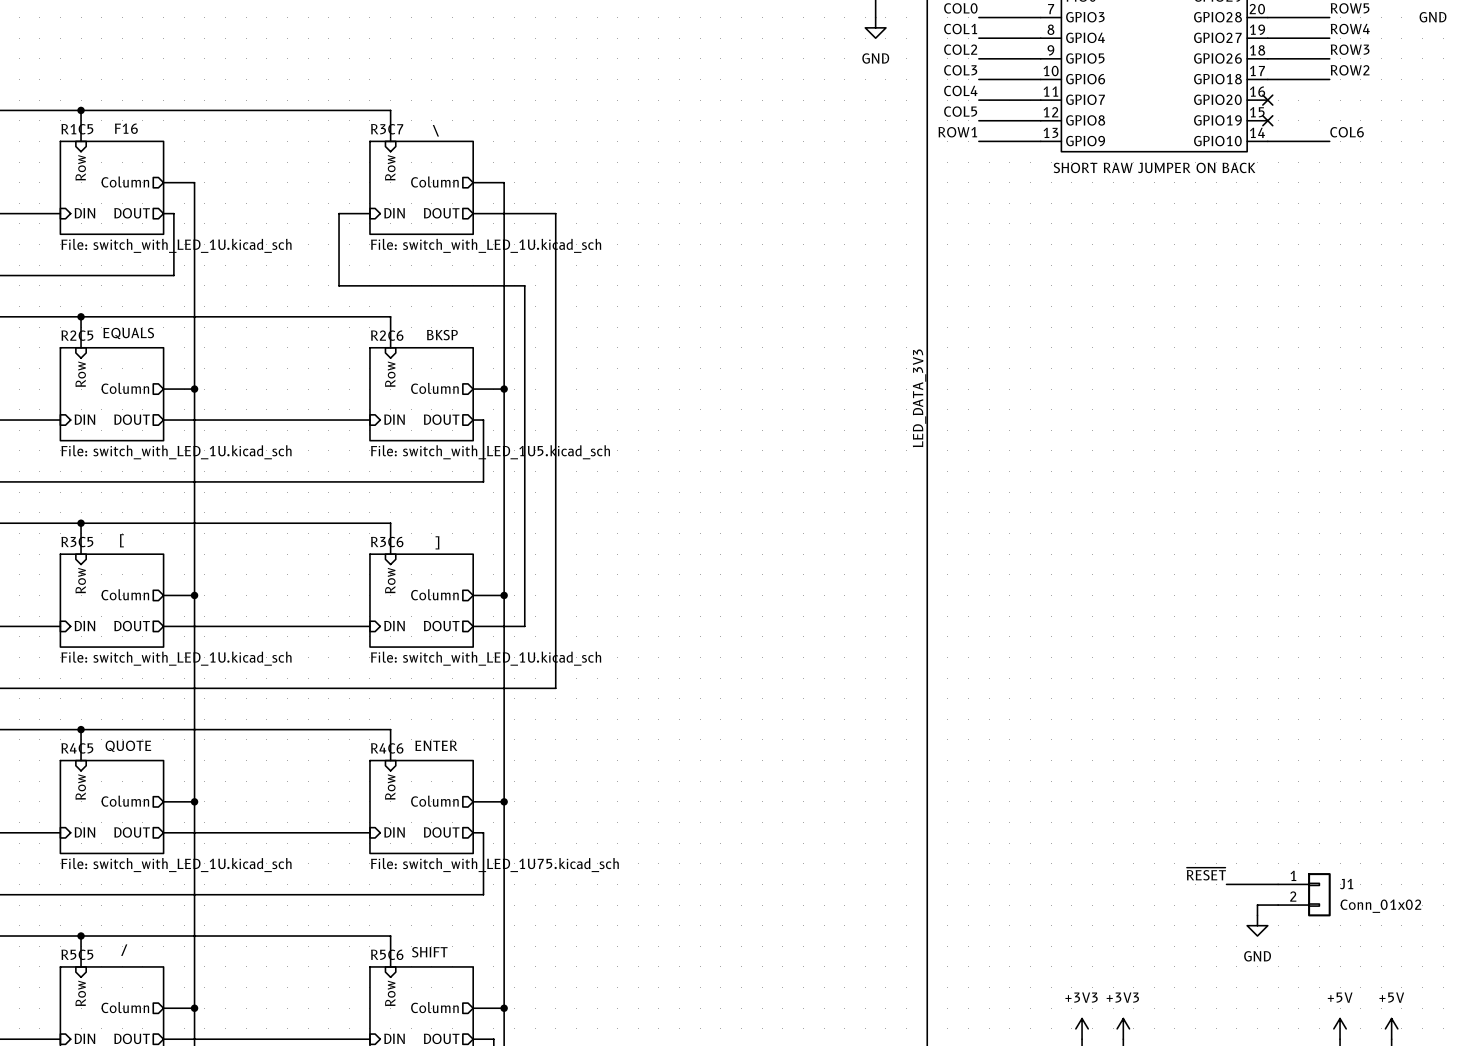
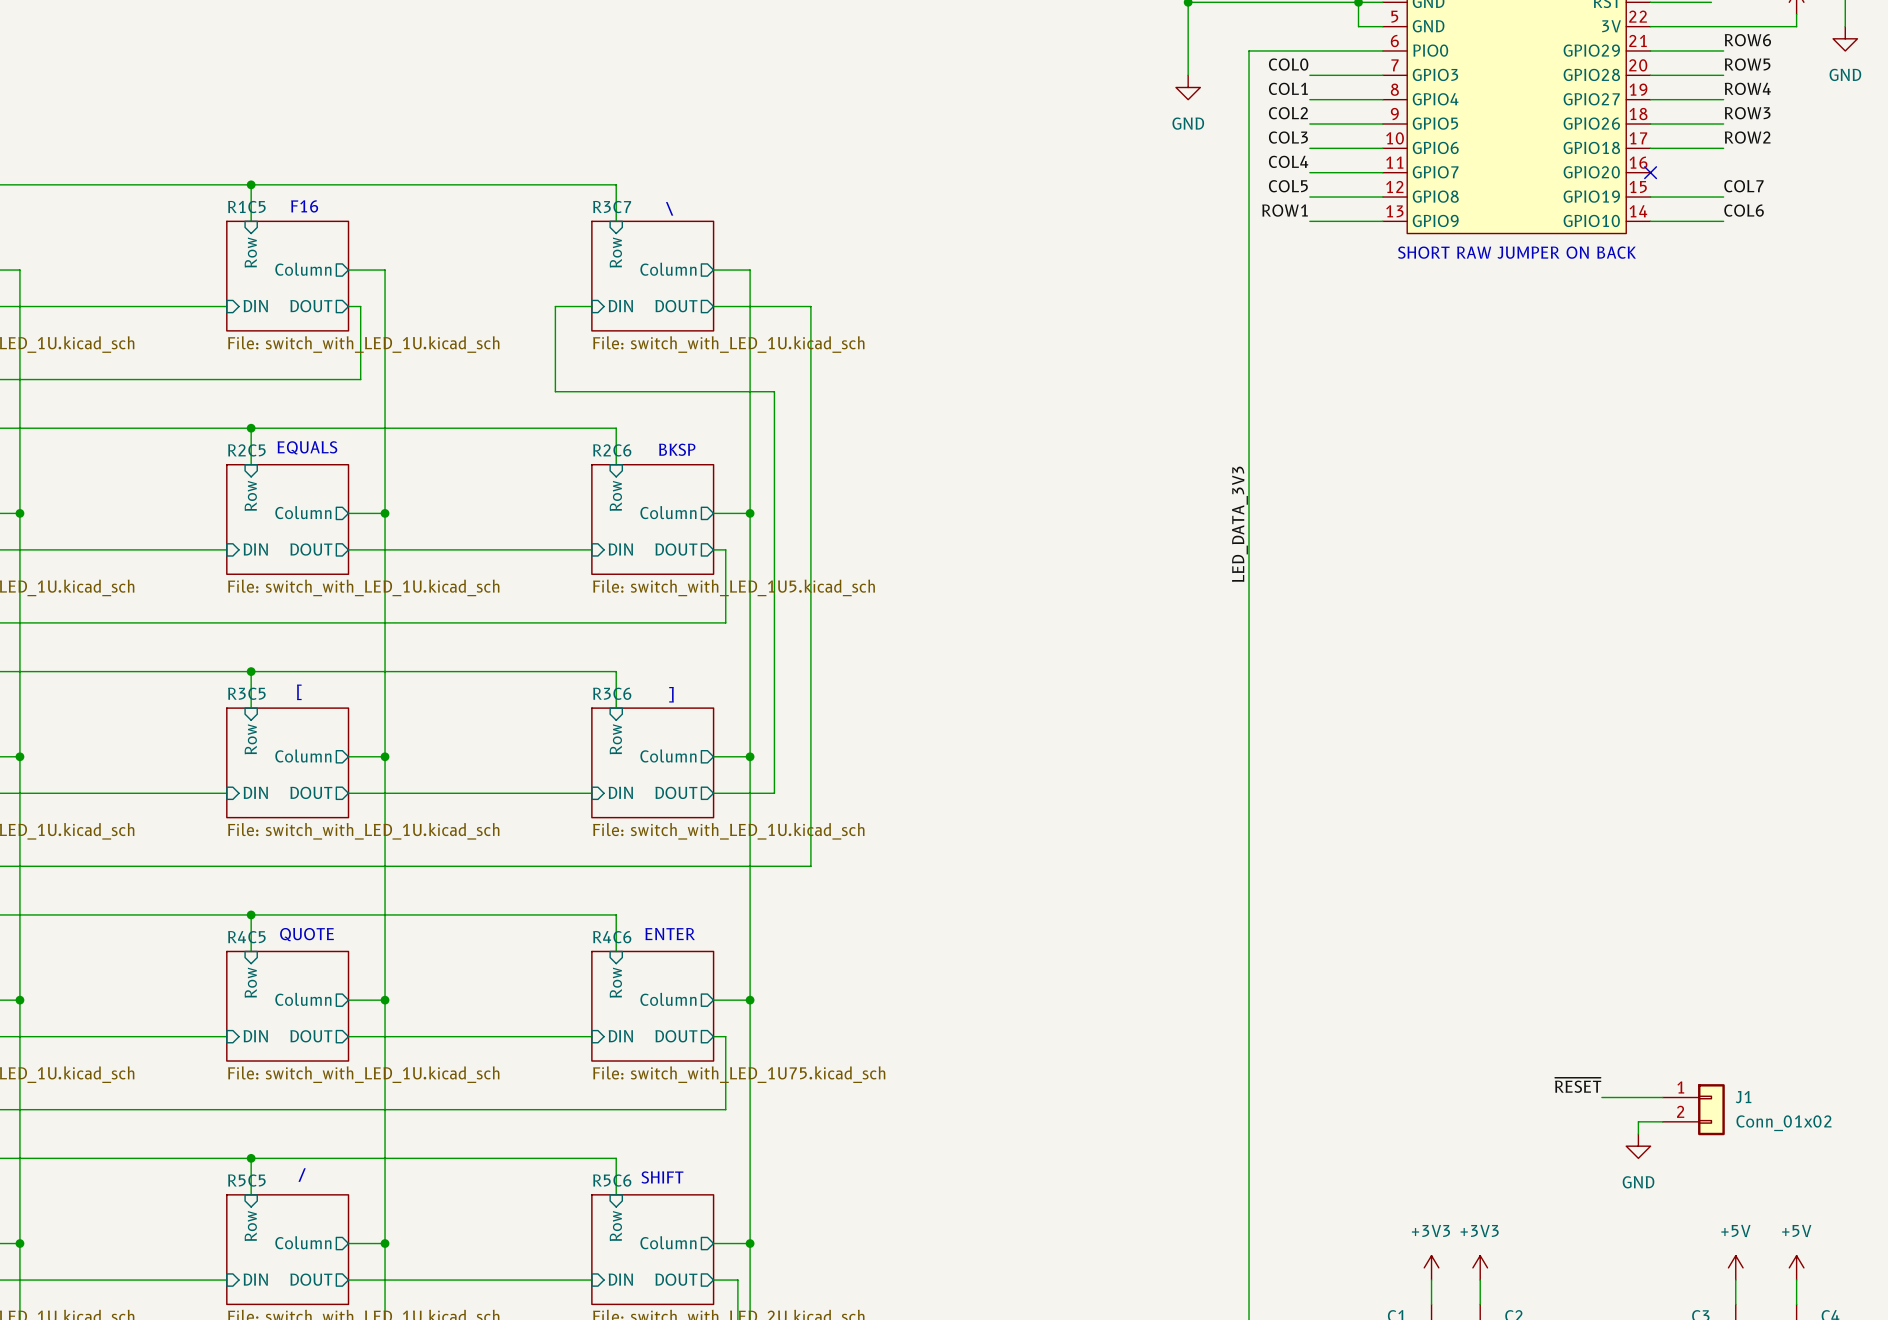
label: none -> COL7 (1743, 186)
wire: none -> (1650, 197) (1723, 197)
no-connect mark: (1267, 120) -> none

